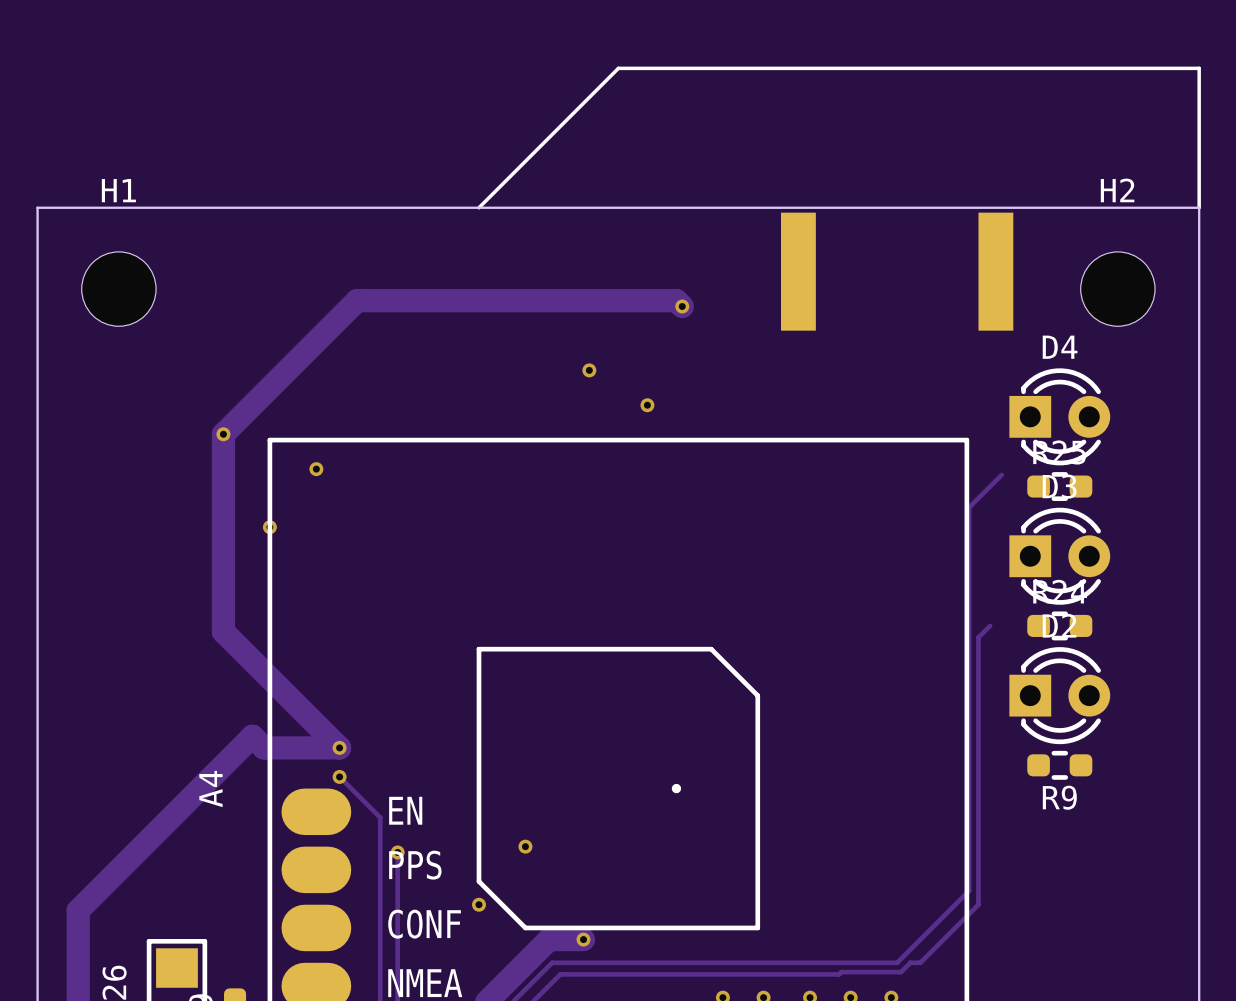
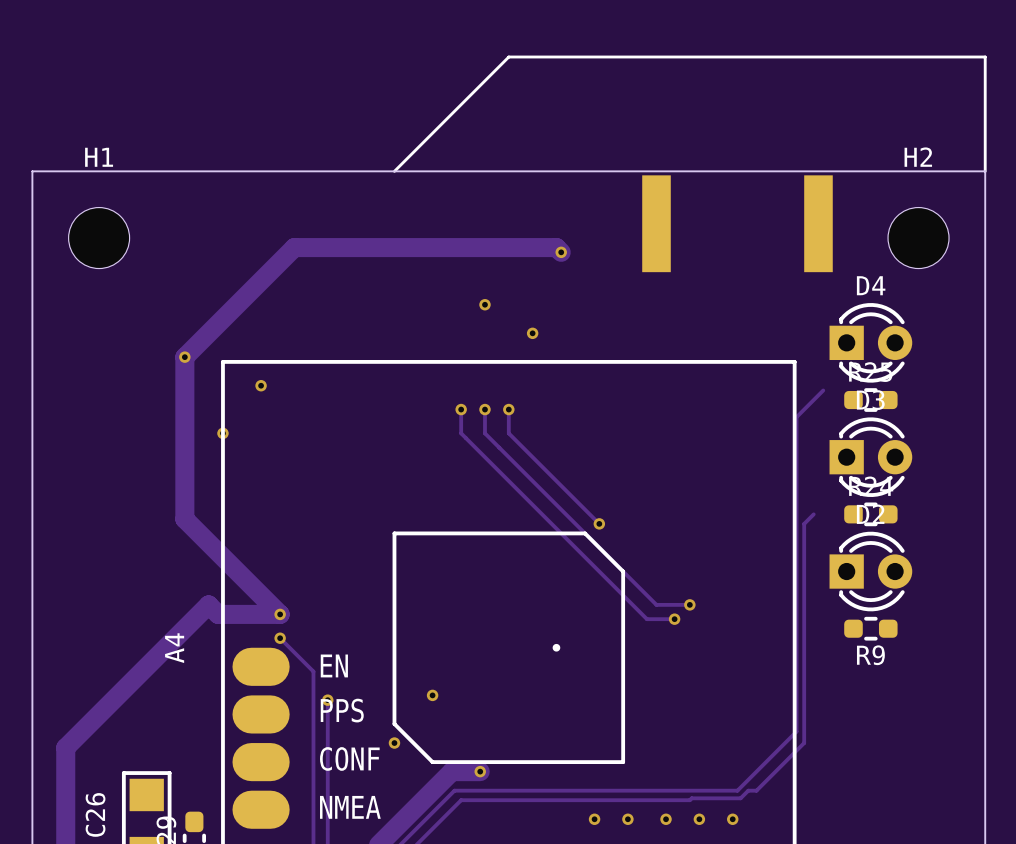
track: none -> (461, 409) (461, 433) (646, 619) (674, 619)
via: none -> (461, 409)
track: none -> (484, 409) (484, 433) (656, 604) (689, 604)
via: none -> (484, 409)
track: none -> (508, 409) (508, 433) (599, 523)
via: none -> (508, 409)
via: none -> (599, 523)
via: none -> (689, 604)
via: none -> (674, 619)

